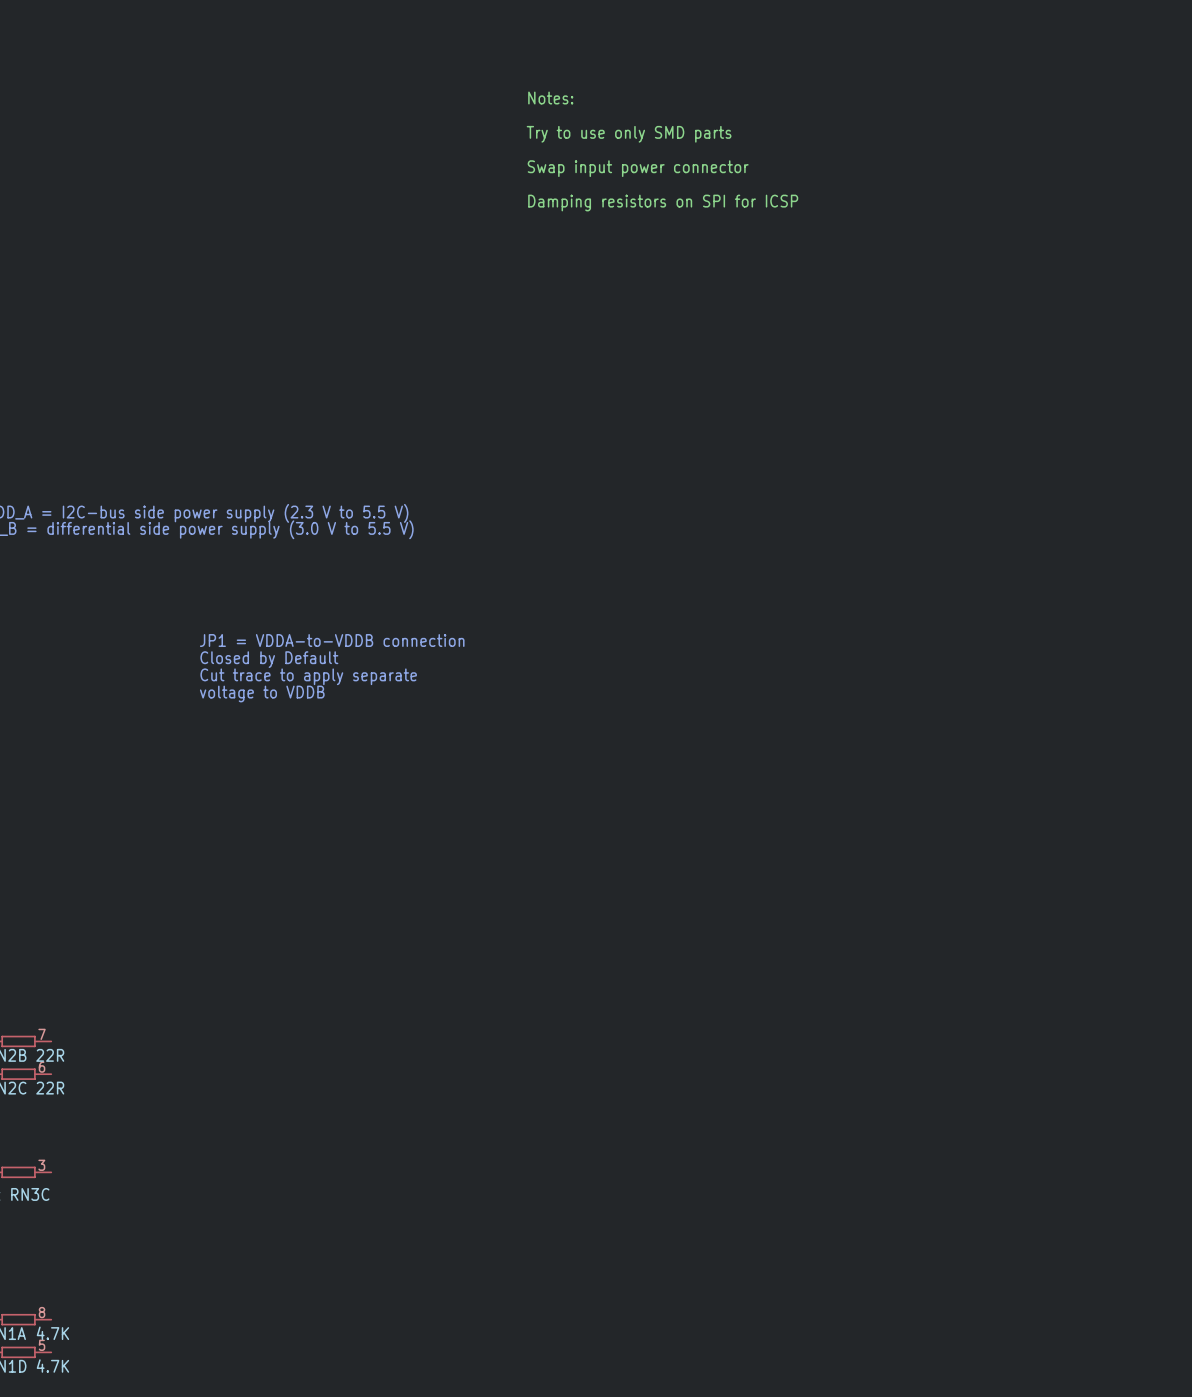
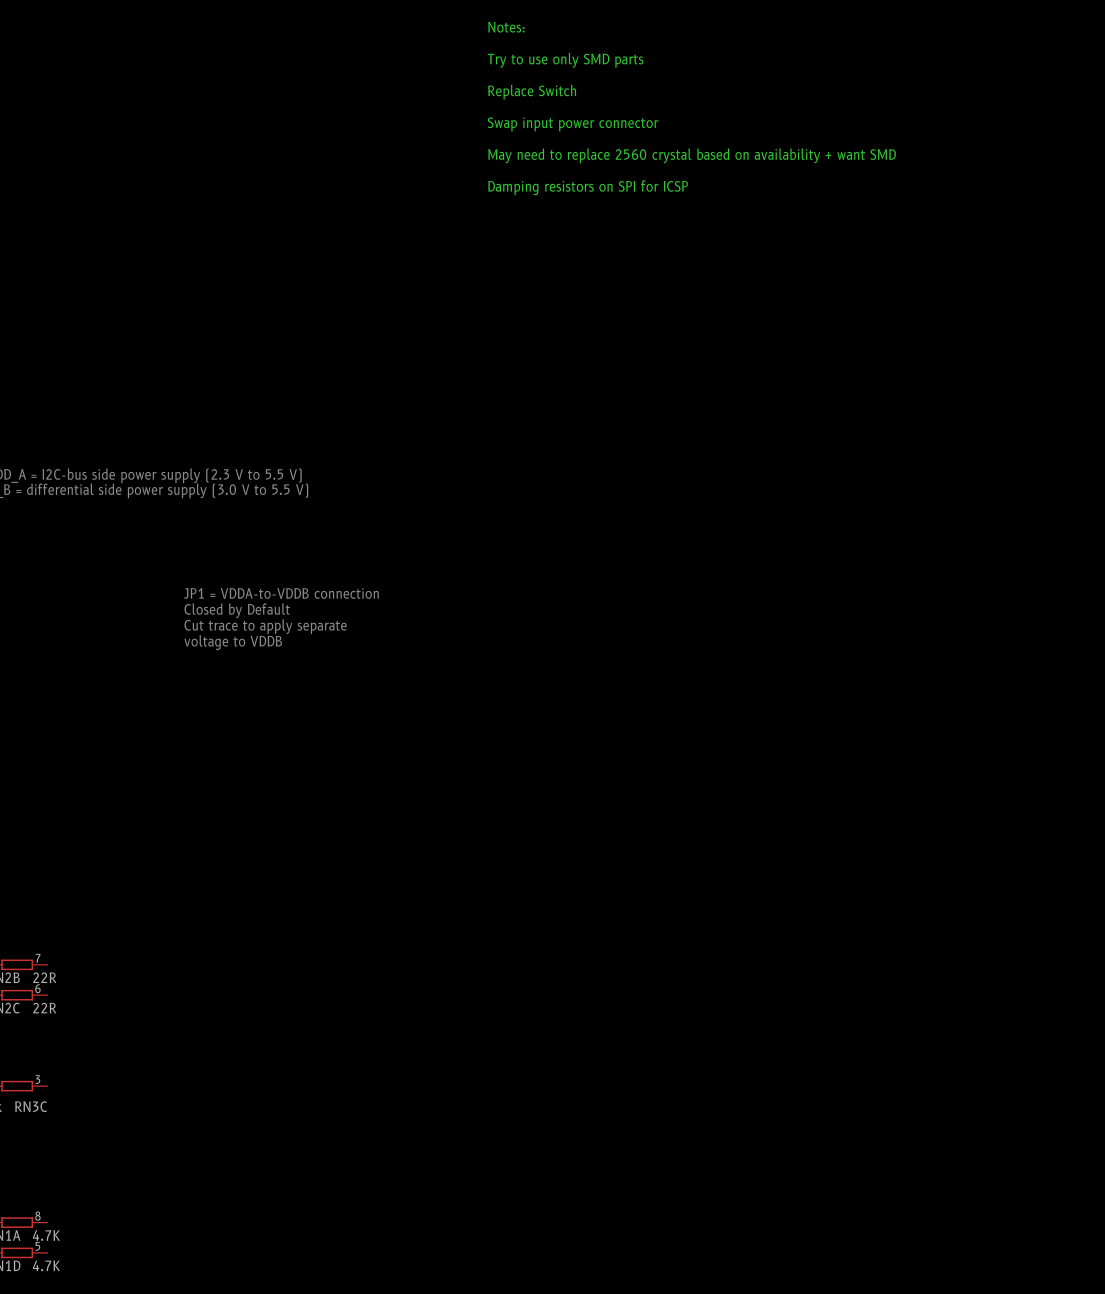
text: none -> Notes: (506, 27)
text: none -> Try to use only SMD parts (565, 60)
text: Notes: (550, 98) -> Replace Switch (532, 92)
text: Try to use only SMD parts (629, 134) -> Swap input power connector (573, 124)
text: Swap input power connector (638, 168) -> May need to replace 2560 crystal based on availability + want SMD (692, 155)

